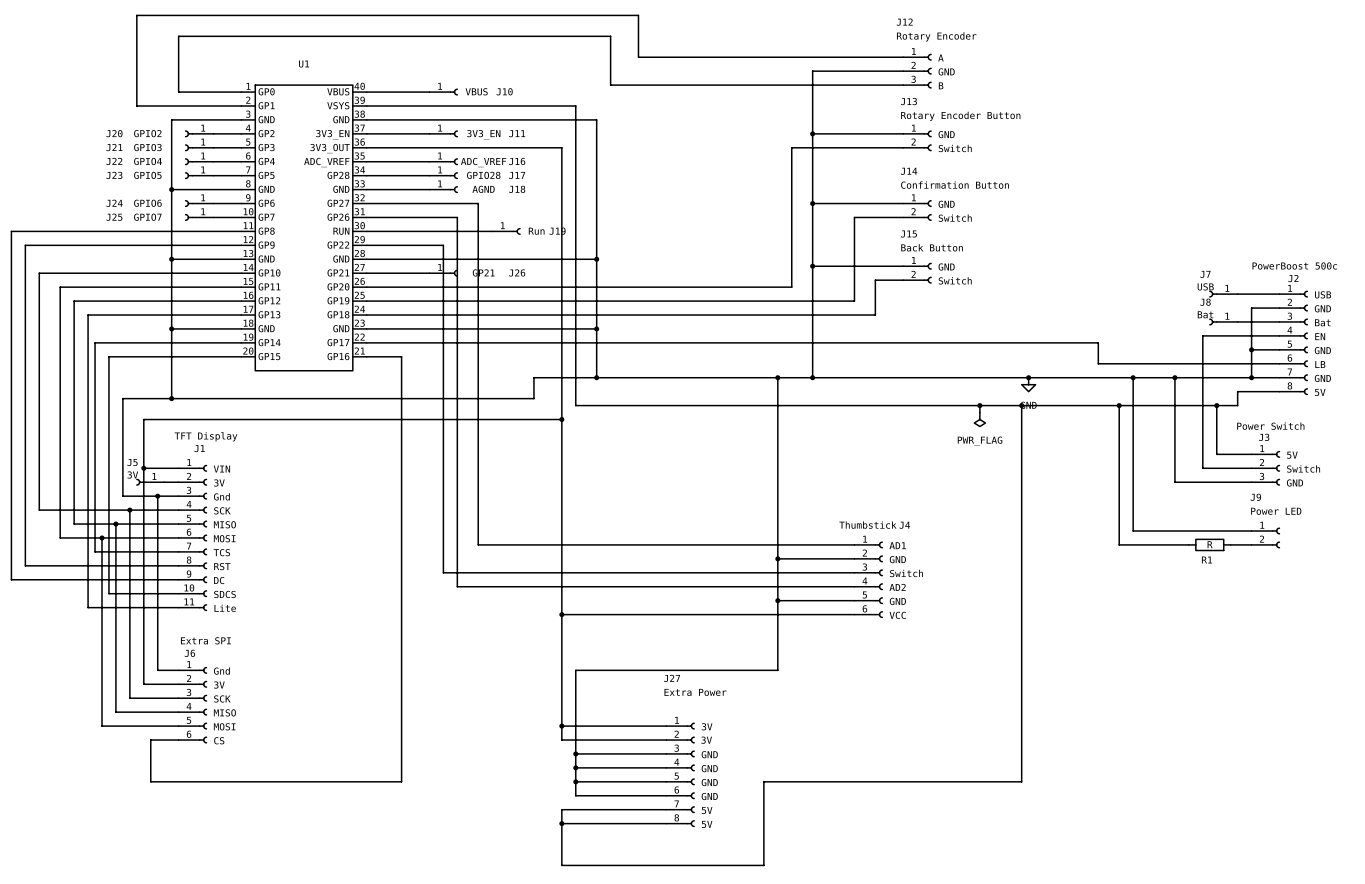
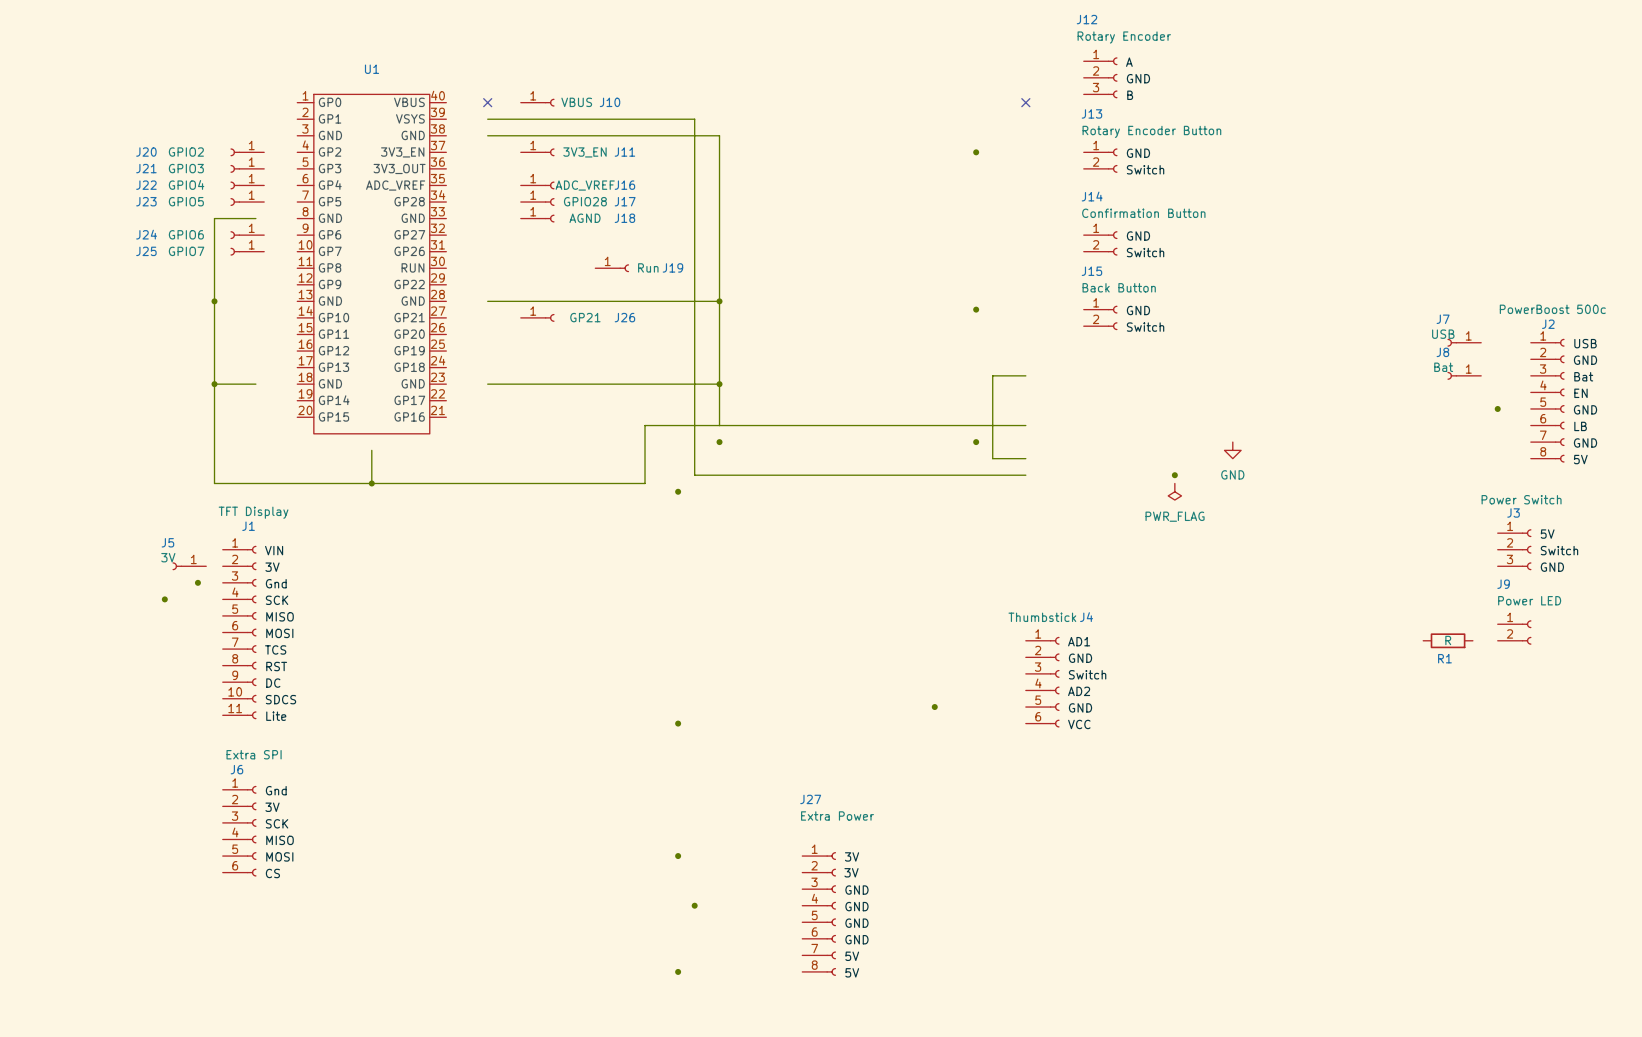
wire: (903, 57) (638, 57) (638, 15) (136, 15) (136, 106) (241, 106) -> none
wire: (903, 71) (812, 71) (812, 377) -> none
wire: (903, 85) (610, 85) (610, 36) (178, 36) (178, 92) (241, 92) -> none
wire: (366, 92) (429, 92) -> none
no-connect mark: none -> (487, 102)
no-connect mark: none -> (1025, 102)
wire: (366, 106) (401, 106) -> none
wire: (241, 119) (171, 119) (171, 189) -> none
wire: (366, 119) (401, 119) -> none
wire: (213, 133) (241, 133) -> none
wire: (366, 133) (429, 133) -> none
wire: (812, 133) (903, 133) -> none
wire: (213, 147) (241, 147) -> none
wire: (366, 147) (561, 147) (561, 740) (666, 740) -> none
wire: (903, 147) (791, 147) (791, 287) (366, 287) -> none
wire: (213, 161) (241, 161) -> none
wire: (366, 161) (429, 161) -> none
wire: (213, 175) (241, 175) -> none
wire: (366, 175) (429, 175) -> none
junction: (171, 189) -> none
wire: (206, 189) (241, 189) -> none
wire: (366, 189) (429, 189) -> none
wire: (213, 203) (241, 203) -> none
wire: (366, 203) (478, 203) (478, 544) (854, 544) -> none
wire: (812, 203) (903, 203) -> none
junction: (812, 203) -> none
wire: (213, 217) (241, 217) -> none
wire: (366, 217) (457, 217) (457, 586) (854, 586) -> none
wire: (903, 217) (854, 217) (854, 301) (366, 301) -> none
wire: (241, 231) (11, 231) (11, 579) (178, 579) -> none
wire: (366, 231) (492, 231) -> none
wire: (241, 245) (25, 245) (25, 565) (178, 565) -> none
wire: (366, 245) (443, 245) (443, 572) (854, 572) -> none
wire: (171, 259) (241, 259) -> none
wire: (366, 259) (401, 259) -> none
wire: (812, 266) (903, 266) -> none
wire: (241, 273) (39, 273) (39, 510) (178, 510) -> none
wire: (366, 273) (429, 273) -> none
wire: (903, 280) (875, 280) (875, 315) (366, 315) -> none
wire: (241, 287) (60, 287) (60, 537) (178, 537) -> none
wire: (1237, 294) (1279, 294) -> none
wire: (241, 301) (74, 301) (74, 524) (178, 524) -> none
wire: (1279, 308) (1251, 308) (1251, 377) -> none
wire: (241, 315) (88, 315) (88, 607) (178, 607) -> none
wire: none -> (1025, 375) (992, 375) (992, 458) (1025, 458)
wire: (1237, 321) (1279, 321) -> none
wire: (206, 328) (241, 328) -> none
wire: (366, 328) (401, 328) -> none
wire: (1279, 335) (1202, 335) (1202, 468) (1251, 468) -> none
wire: (241, 342) (95, 342) (95, 551) (178, 551) -> none
wire: (366, 342) (1098, 342) (1098, 363) (1279, 363) -> none
wire: (1251, 349) (1279, 349) -> none
wire: (241, 356) (108, 356) (108, 593) (178, 593) -> none
wire: (366, 356) (401, 356) (401, 781) (150, 781) (150, 740) (178, 740) -> none
wire: (596, 363) (596, 377) -> none
wire: (533, 377) (1279, 377) -> (645, 442) (645, 425) (1025, 425)
wire: (777, 377) (777, 670) (575, 670) (575, 795) (666, 795) -> none
junction: (777, 377) -> none
junction: (1028, 377) -> none
wire: (1133, 377) (1133, 531) (1251, 531) -> none
junction: (1133, 377) -> none
wire: (1174, 377) (1174, 482) (1251, 482) -> none
junction: (1174, 377) -> none
junction: (1251, 377) -> none
wire: none -> (371, 450) (371, 483)
wire: (1279, 391) (1237, 391) (1237, 405) (854, 405) -> none
junction: (171, 398) -> none
wire: (533, 398) (122, 398) (122, 496) (178, 496) -> (645, 466) (645, 483) (214, 483) (214, 466)
wire: (979, 405) (979, 412) -> none
wire: (1021, 405) (1021, 781) (763, 781) (763, 865) (561, 865) (561, 809) (666, 809) -> none
junction: (1021, 405) -> none
wire: (1119, 405) (1119, 544) (1188, 544) -> none
junction: (1119, 405) -> none
wire: (1216, 405) (1216, 454) (1251, 454) -> none
junction: (1216, 405) -> none
junction: none -> (371, 483)
wire: (561, 419) (143, 419) (143, 684) (178, 684) -> none
wire: (143, 468) (178, 468) -> none
junction: (143, 468) -> none
wire: (164, 482) (178, 482) -> none
wire: (157, 496) (157, 670) (178, 670) -> none
wire: (129, 510) (129, 698) (178, 698) -> none
wire: (115, 524) (115, 712) (178, 712) -> none
junction: (115, 524) -> none
wire: (102, 537) (102, 726) (178, 726) -> none
junction: (102, 537) -> none
wire: (1230, 544) (1251, 544) -> none
wire: (777, 558) (854, 558) -> none
junction: (777, 558) -> none
wire: (777, 600) (854, 600) -> none
wire: (561, 614) (854, 614) -> none
wire: (561, 726) (666, 726) -> none
wire: (575, 753) (666, 753) -> none
junction: (575, 753) -> none
wire: (575, 767) (666, 767) -> none
wire: (575, 781) (666, 781) -> none
junction: (575, 781) -> none
wire: (561, 823) (666, 823) -> none

